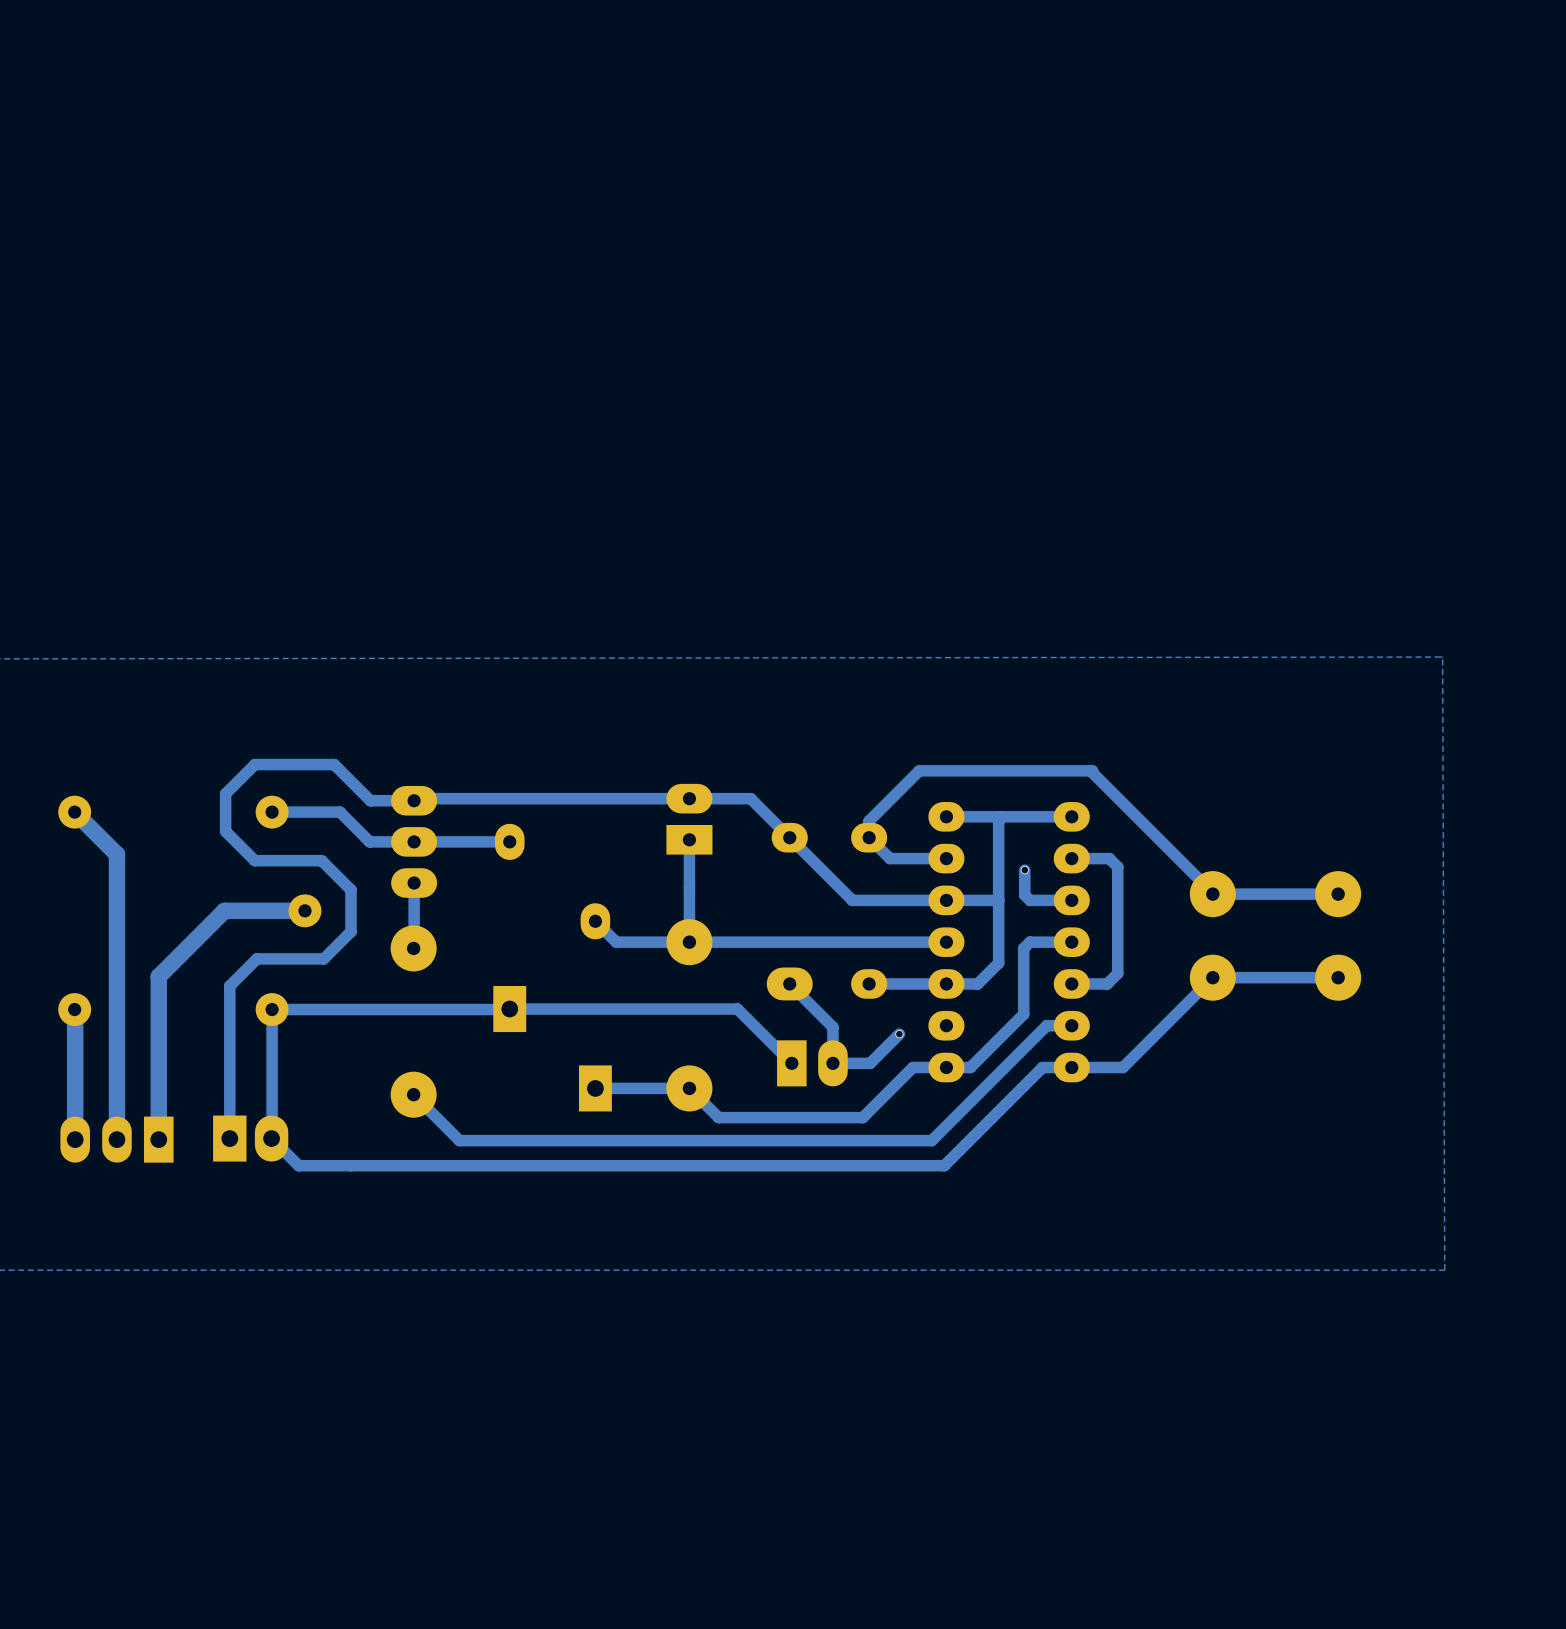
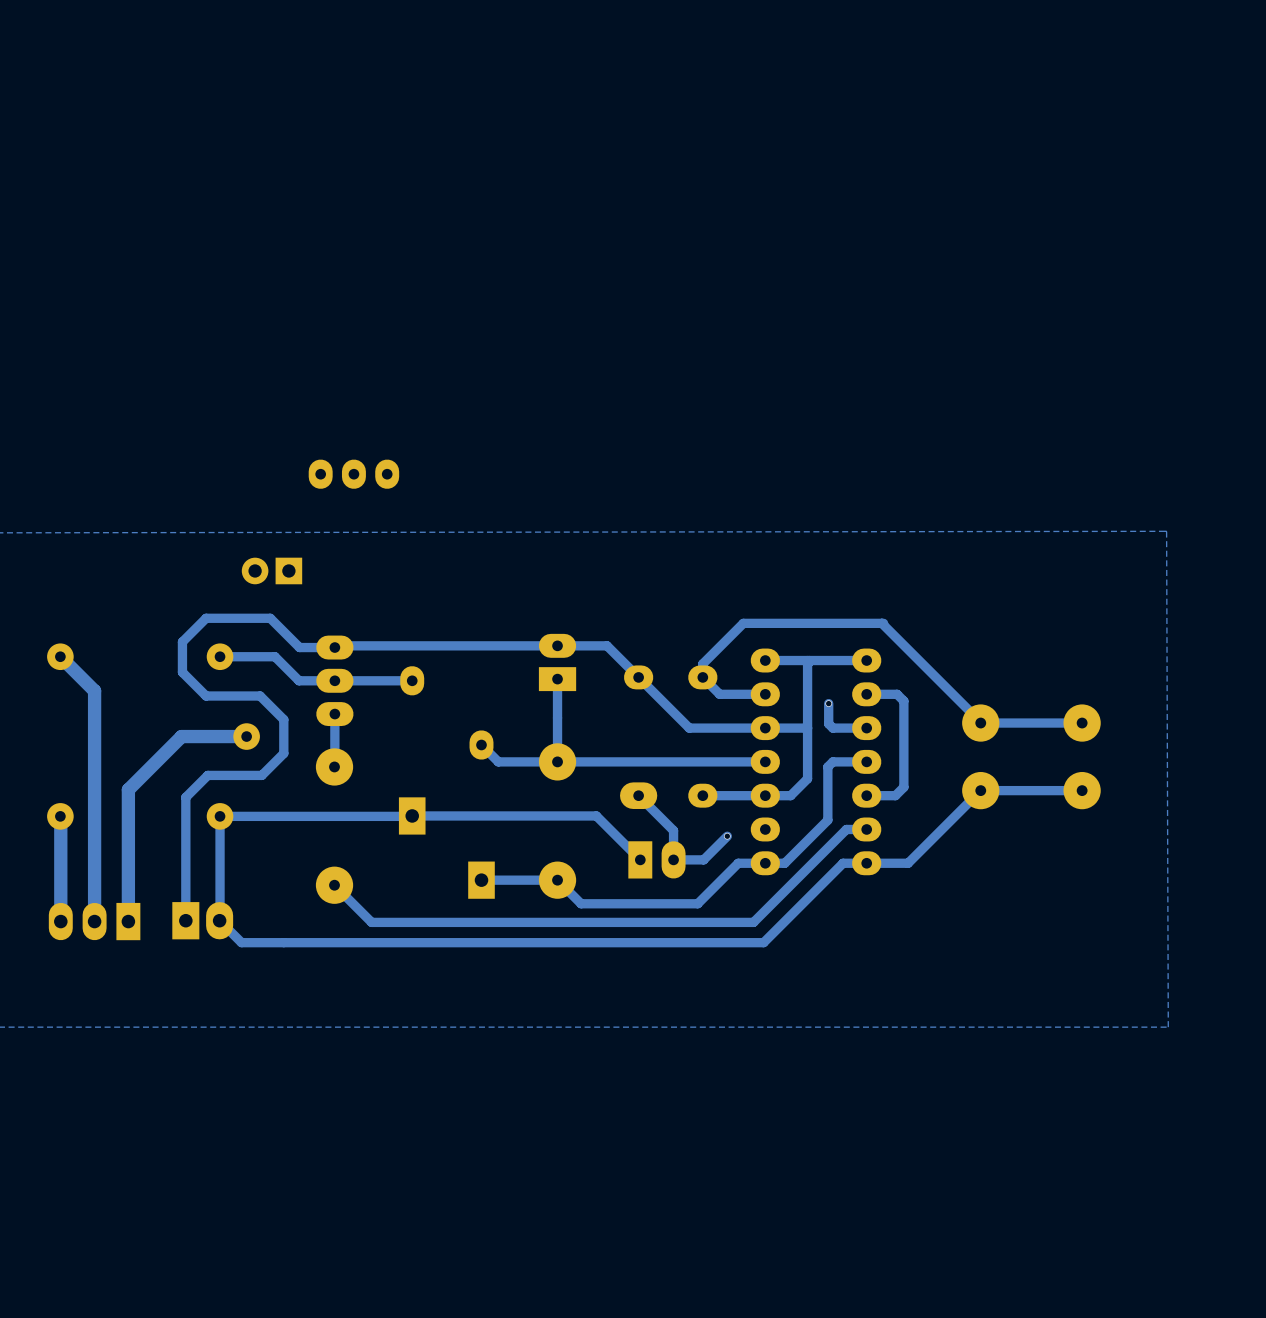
part: none -> (353, 474)
part: none -> (271, 570)

